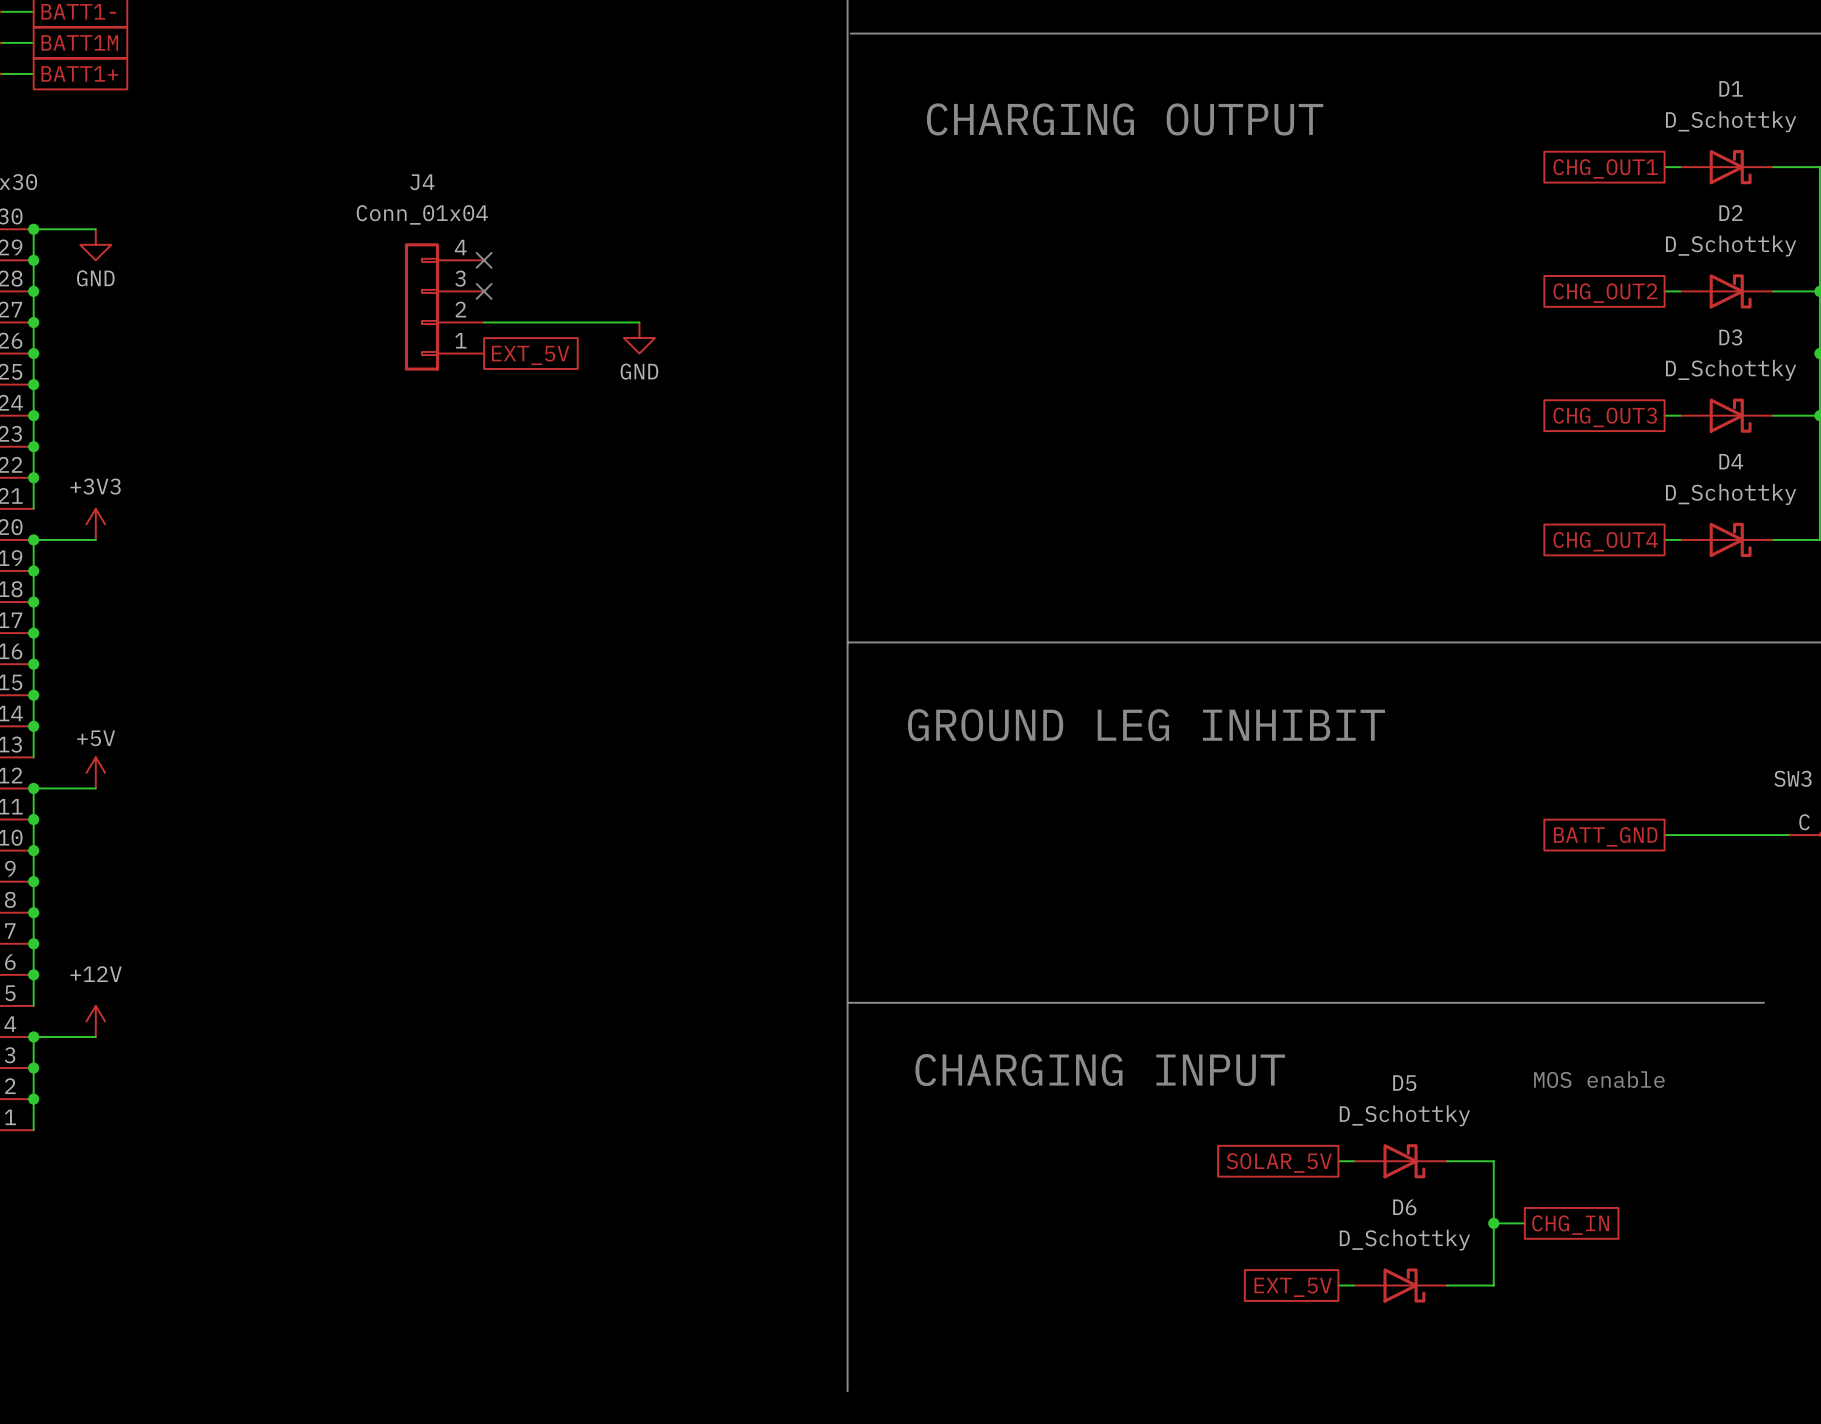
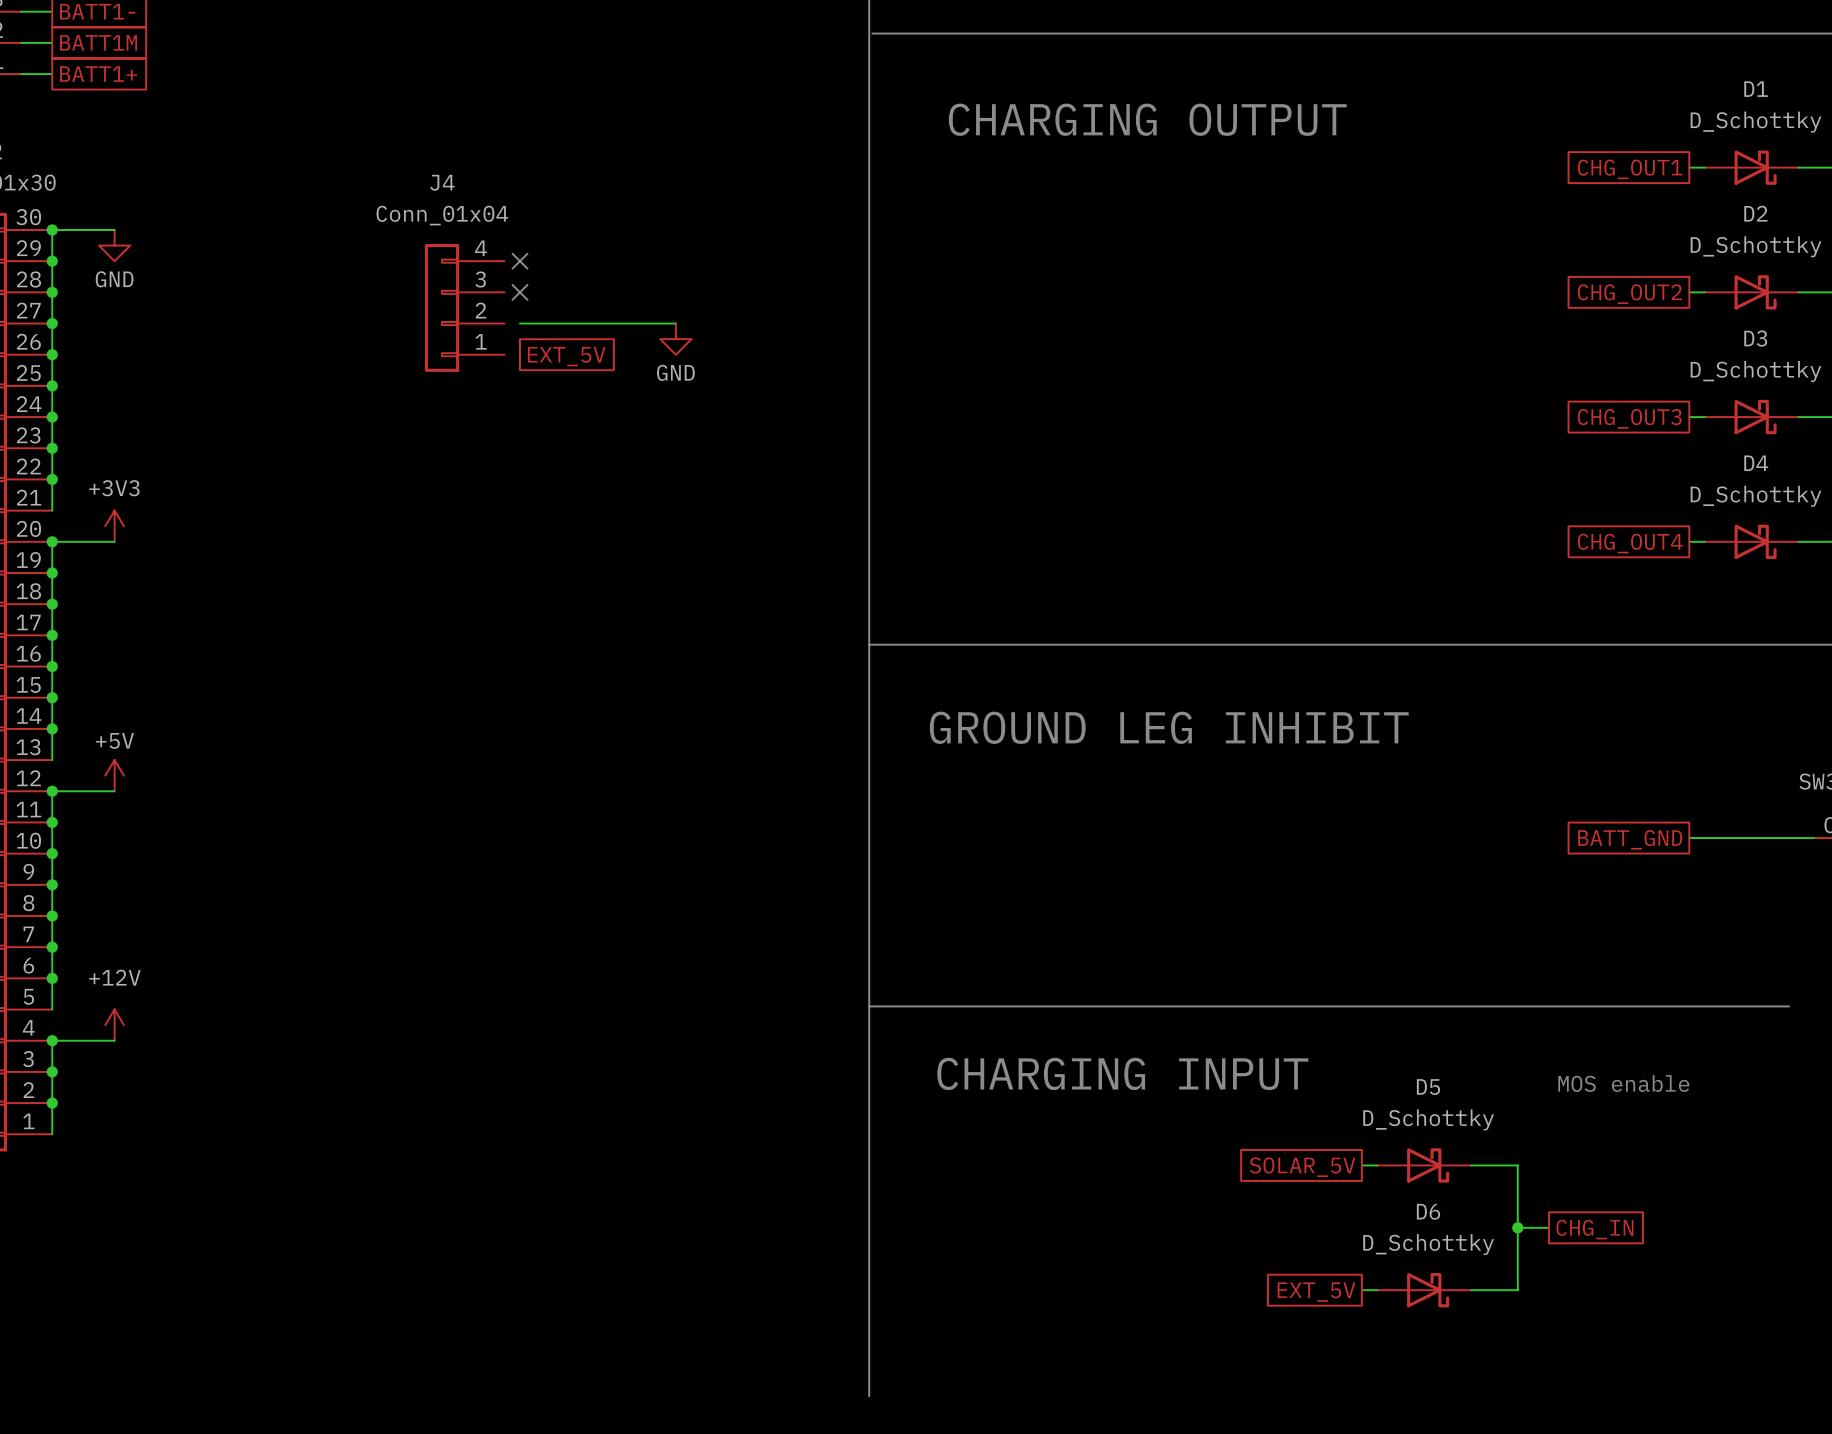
no-connect mark position: (484, 260) -> (519, 261)
no-connect mark position: (484, 291) -> (519, 292)
wire: (484, 322) (499, 322) -> (660, 323) (675, 323)
power symbol position: GND (639, 338) -> GND (675, 339)
global label position: EXT_5V (530, 355) -> EXT_5V (566, 356)

